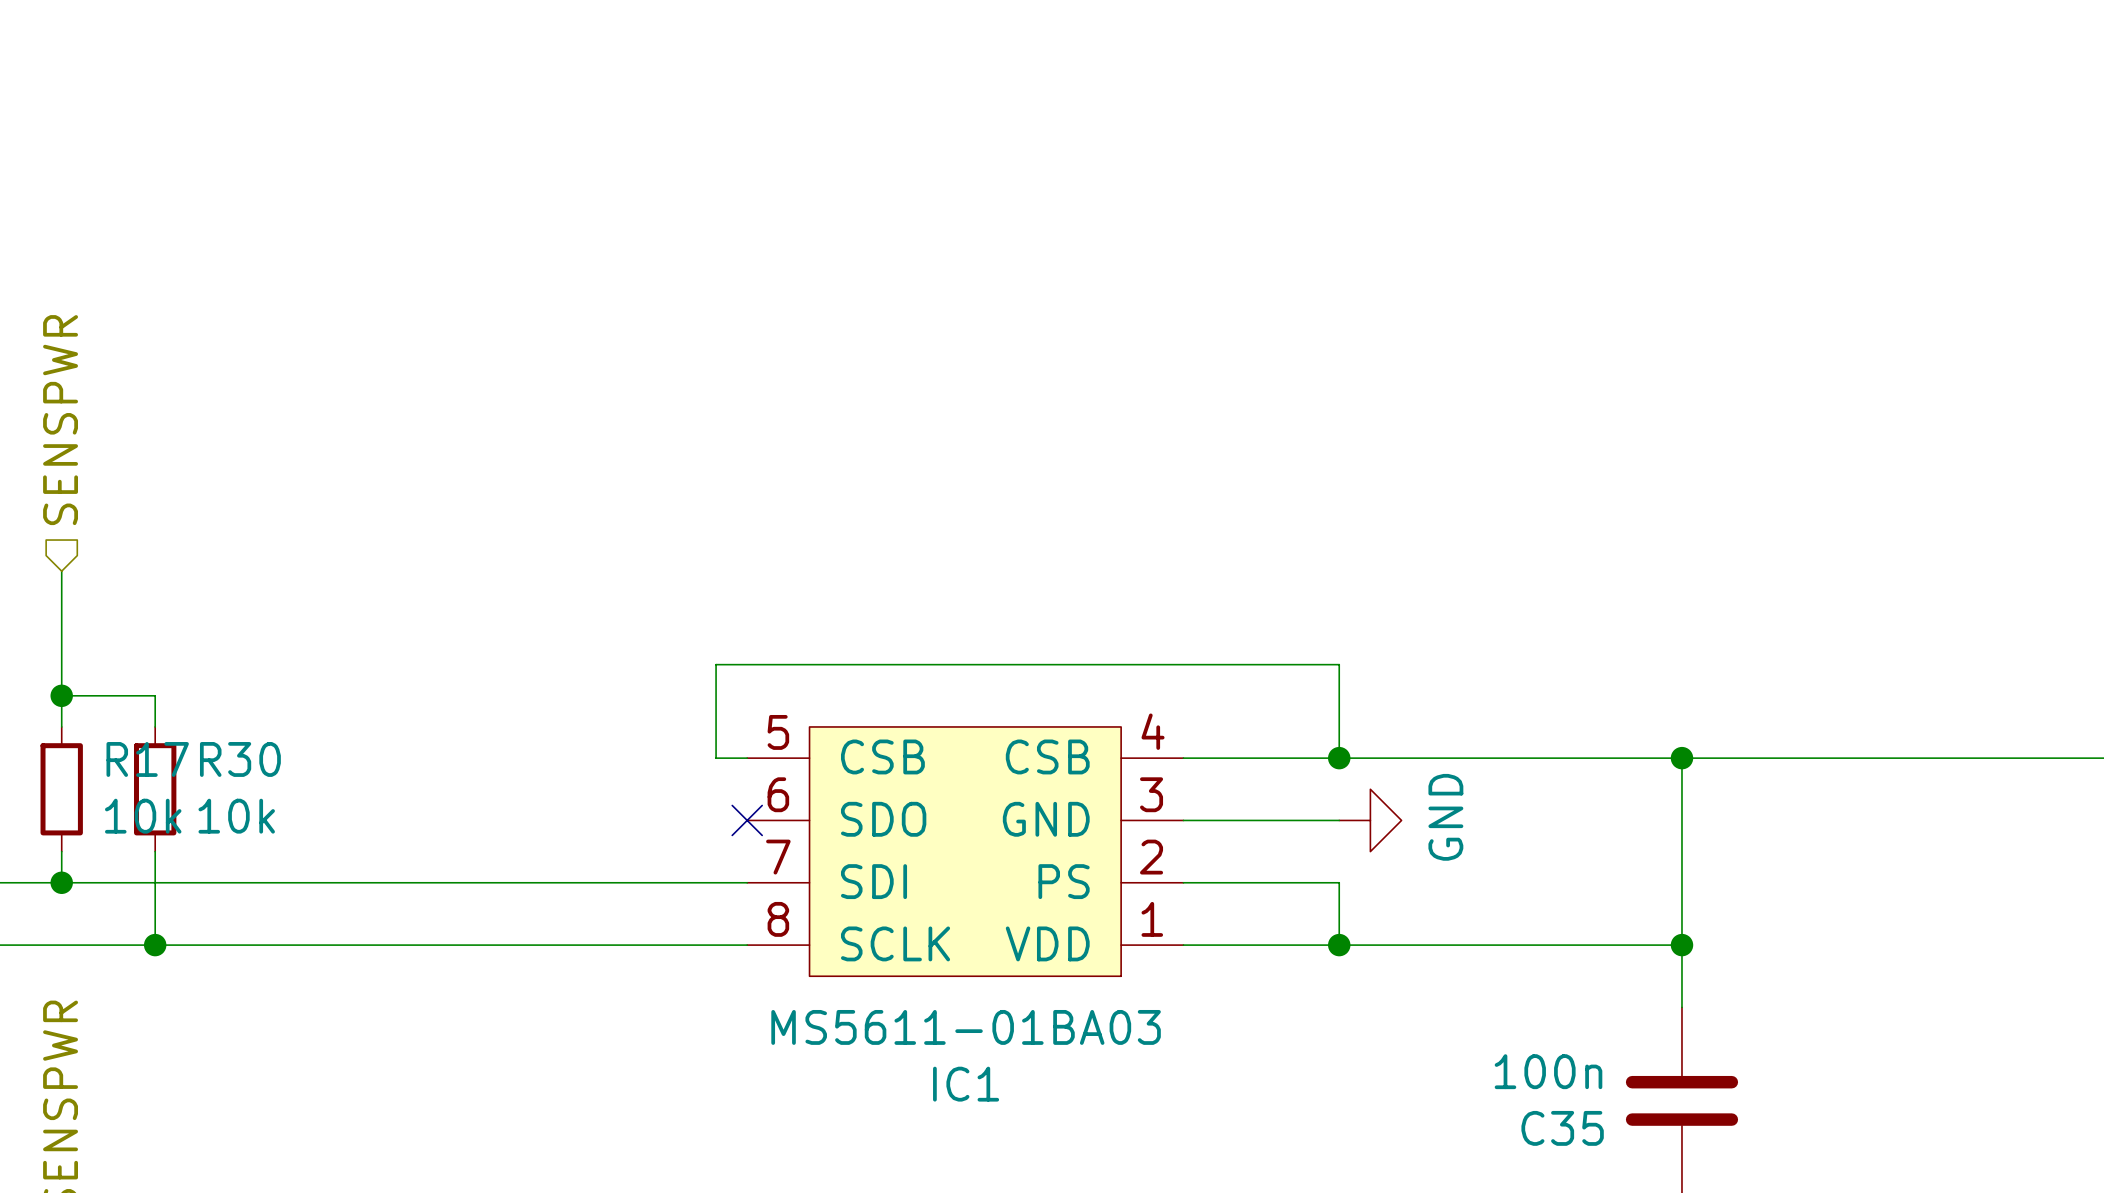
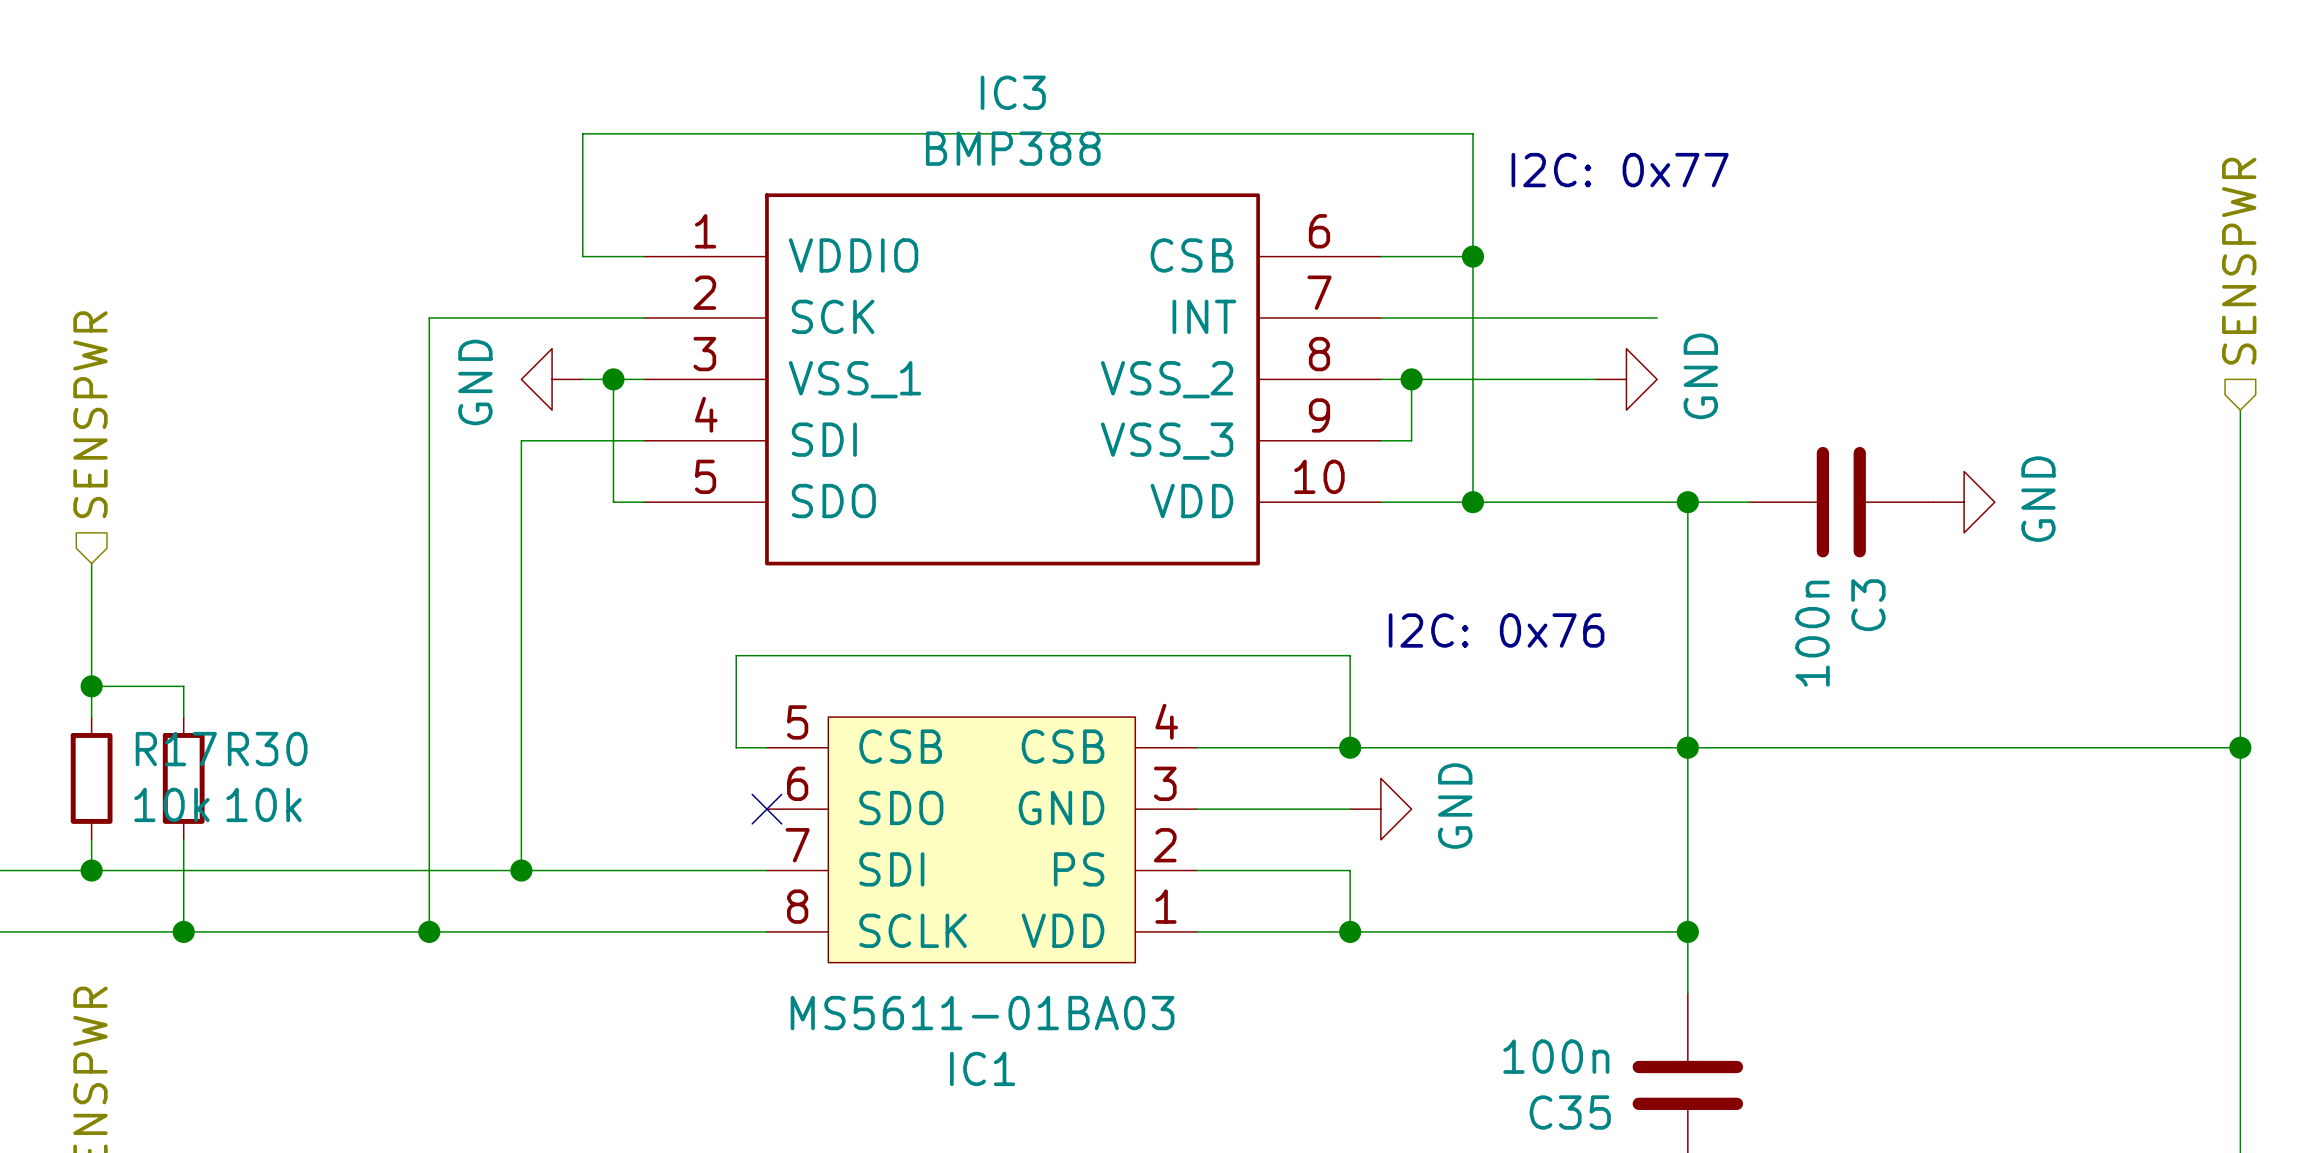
text: none -> I2C: 0x77 (1620, 170)
wire: none -> (644, 256) (582, 256) (582, 133) (1472, 133) (1472, 502)
wire: none -> (1380, 256) (1472, 256)
junction: none -> (1472, 256)
wire: none -> (644, 318) (429, 318) (429, 931)
wire: none -> (1380, 318) (1657, 318)
power symbol: none -> GND (552, 379)
wire: none -> (582, 379) (644, 379)
wire: none -> (613, 379) (613, 502) (644, 502)
junction: none -> (613, 379)
IC3: none -> BMP388 (1012, 379)
wire: none -> (1380, 379) (1595, 379)
wire: none -> (1411, 379) (1411, 440) (1380, 440)
junction: none -> (1411, 379)
power symbol: none -> GND (1626, 379)
wire: none -> (644, 440) (521, 440) (521, 870)
wire: none -> (1380, 502) (1749, 502)
junction: none -> (1472, 502)
wire: none -> (1687, 502) (1687, 747)
junction: none -> (1687, 502)
C3: none -> 100n (1841, 502)
power symbol: none -> GND (1964, 502)
text: none -> I2C: 0x76 (1496, 630)
junction: none -> (521, 870)
junction: none -> (429, 931)

